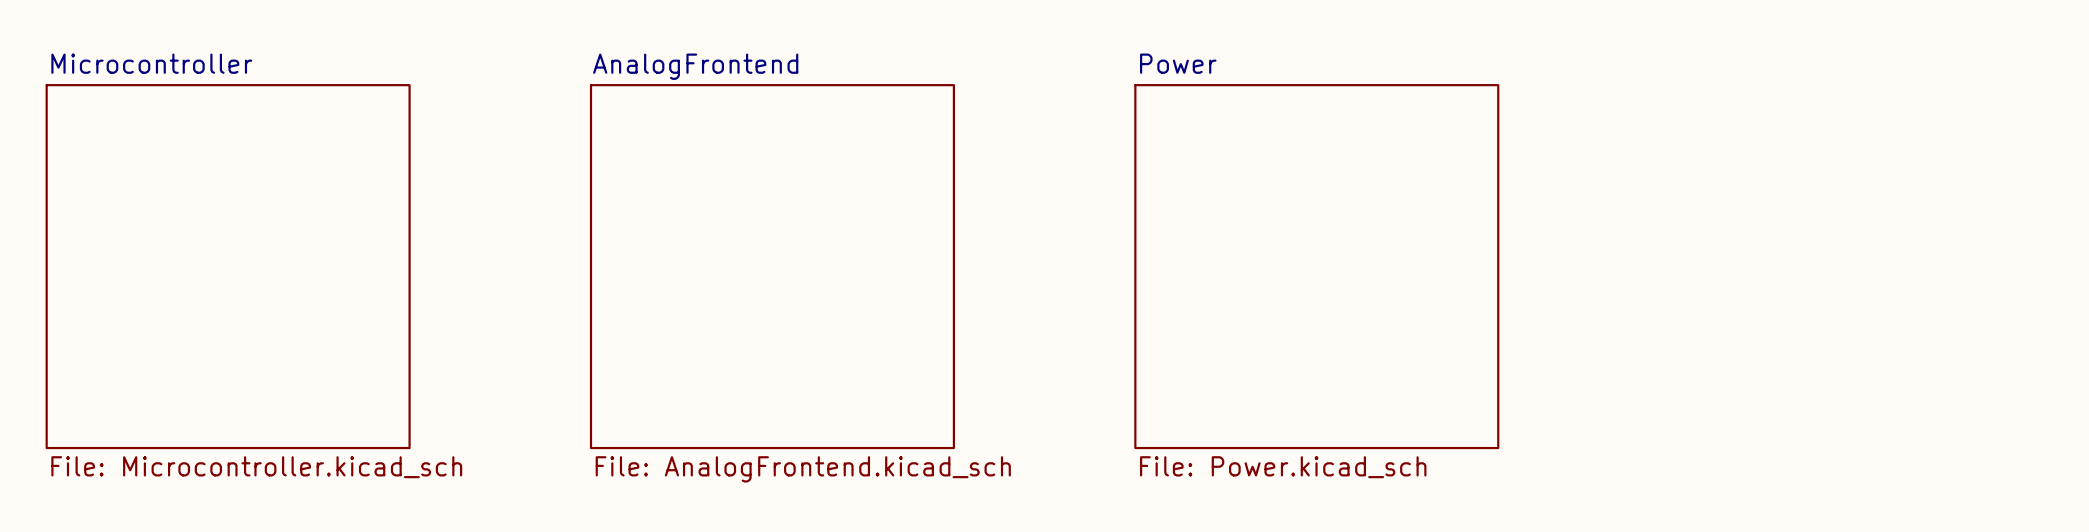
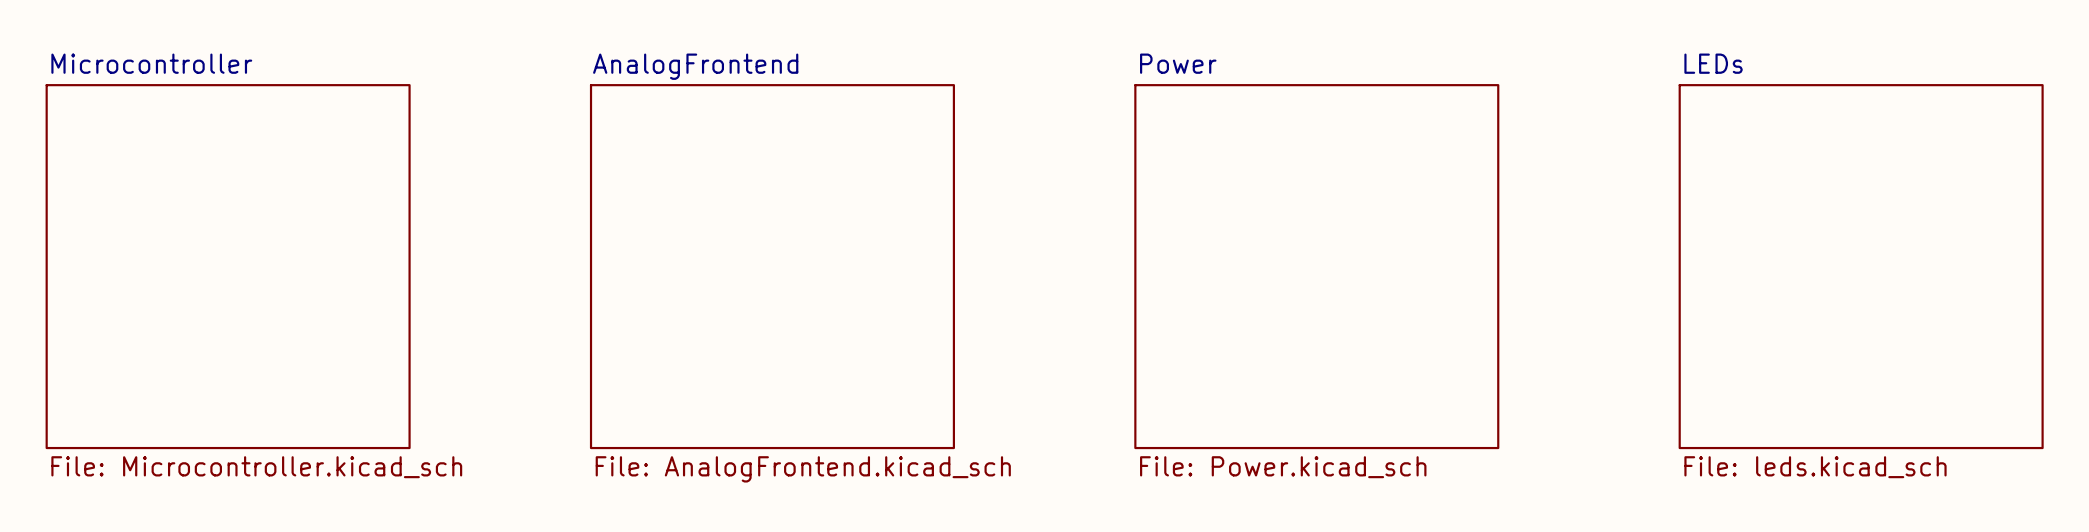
sheet LEDs: none -> File: leds.kicad_sch (1861, 266)

